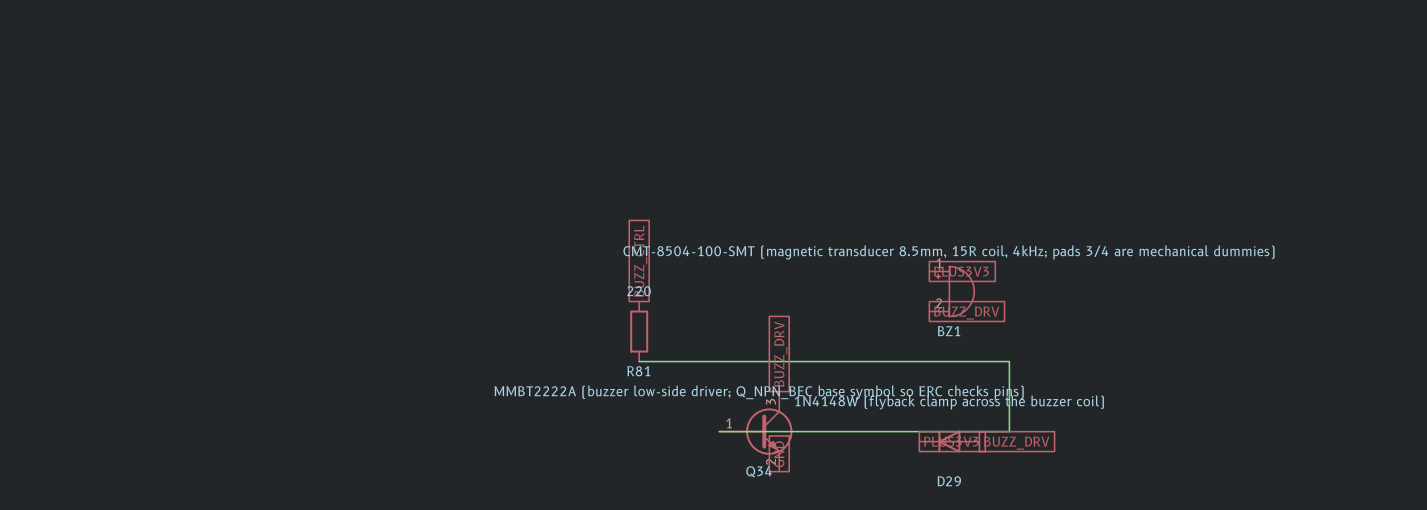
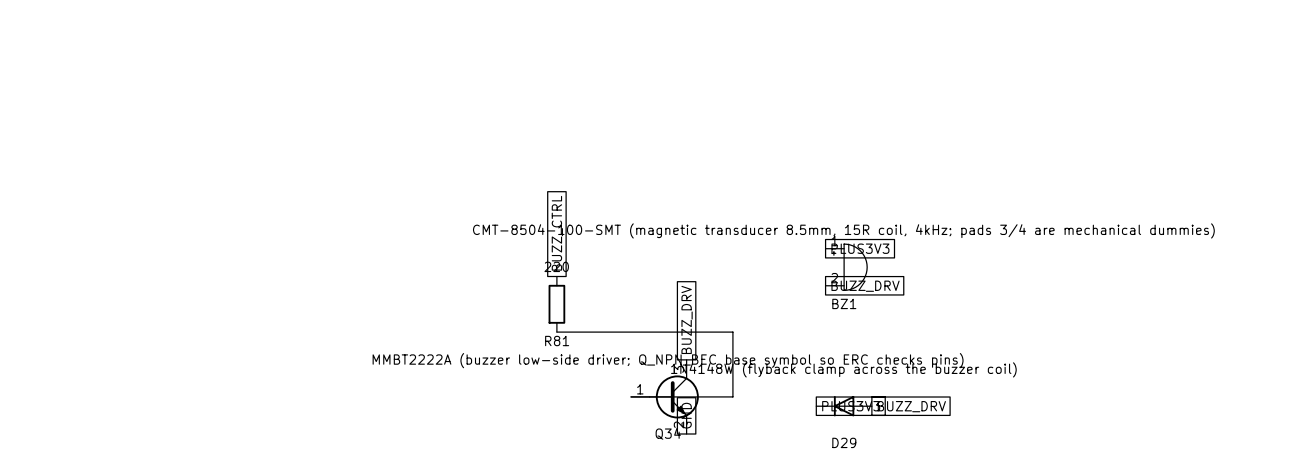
wire: (829, 361) (1009, 361) (1009, 431) (829, 431) -> (732, 332) (732, 396)

